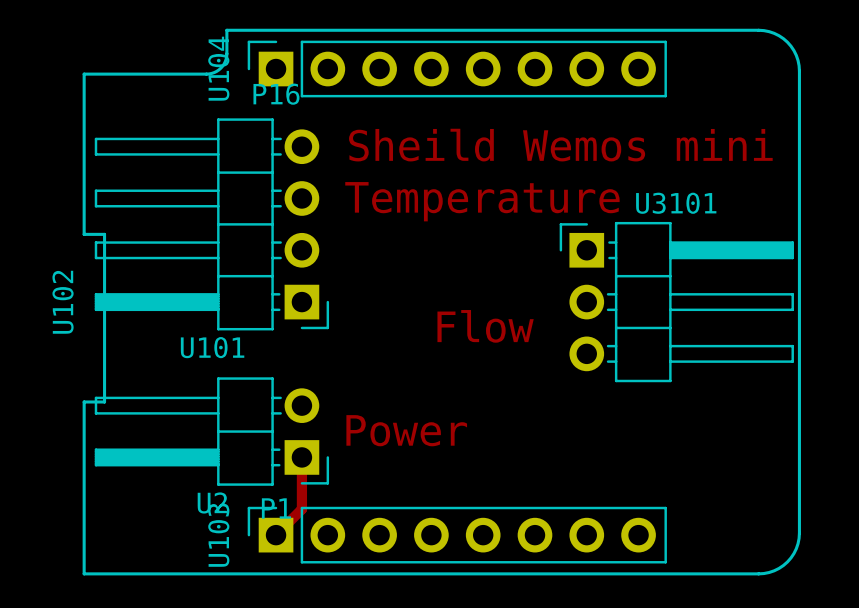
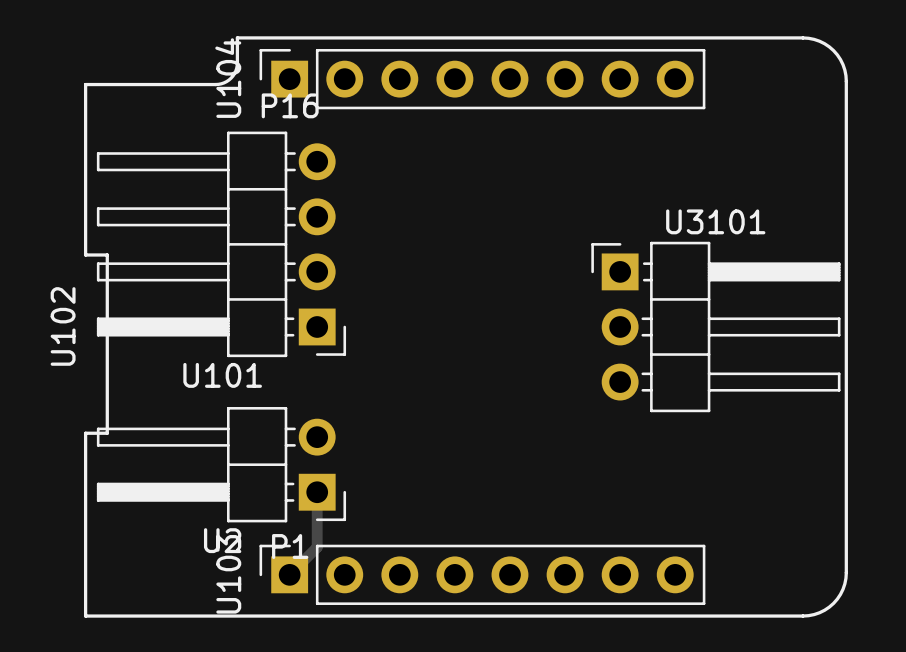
text: Sheild Wemos mini (560, 145) -> none
text: Temperature (482, 201) -> none
text: Flow (485, 326) -> none
text: Power (406, 430) -> none

